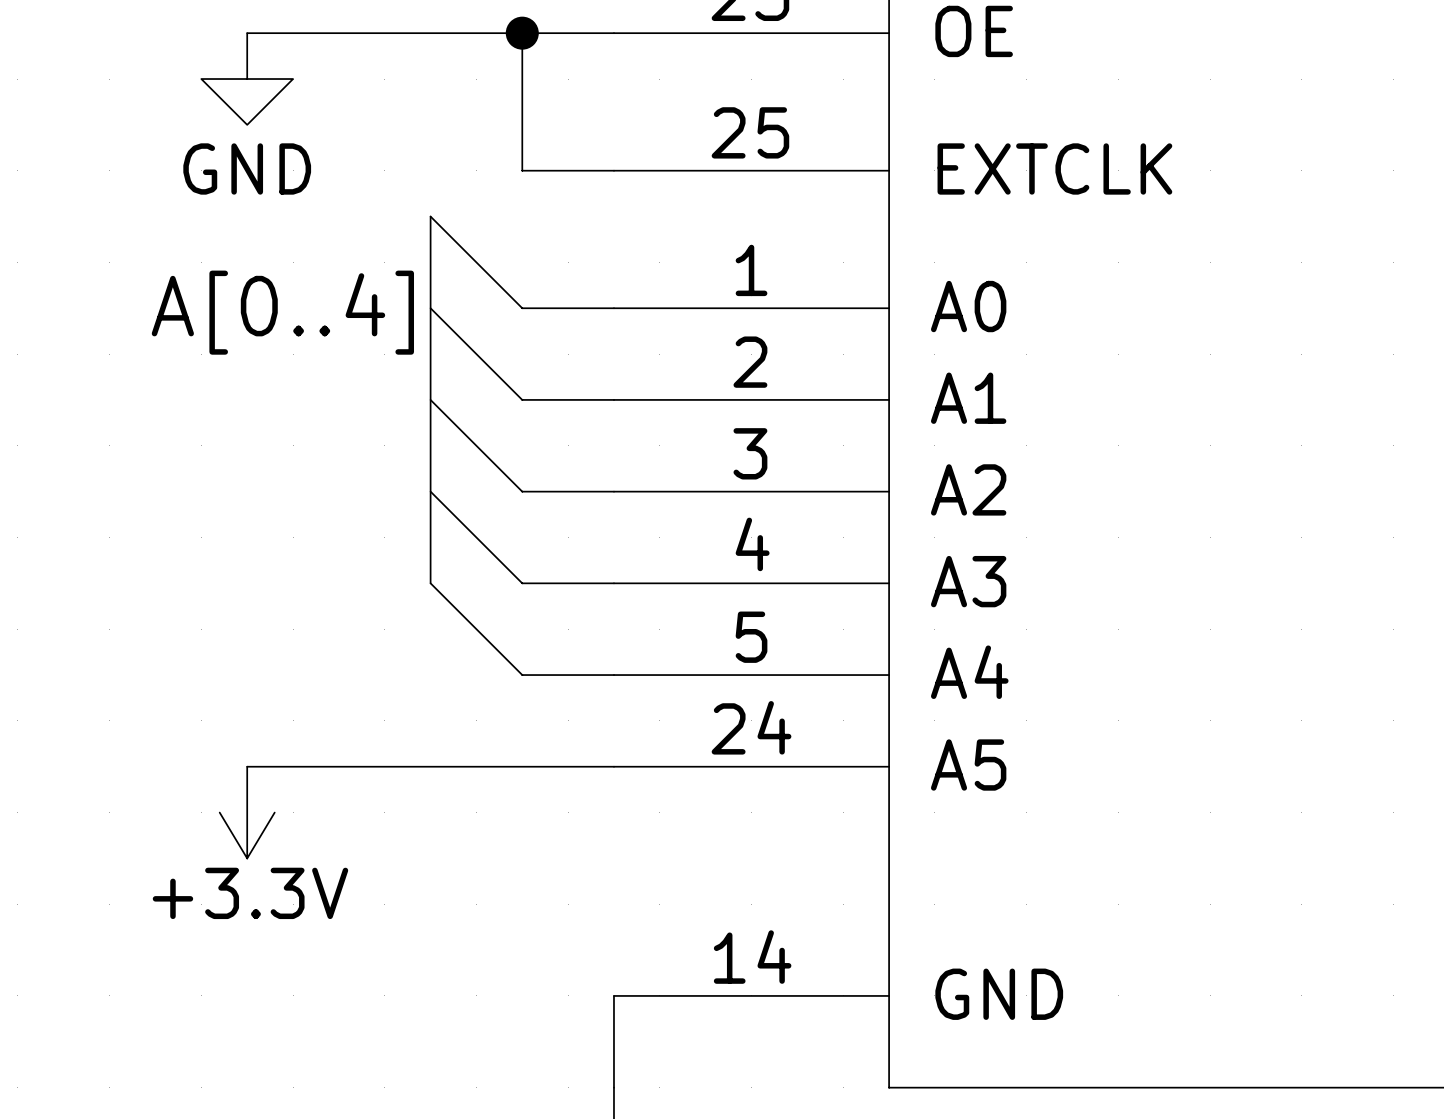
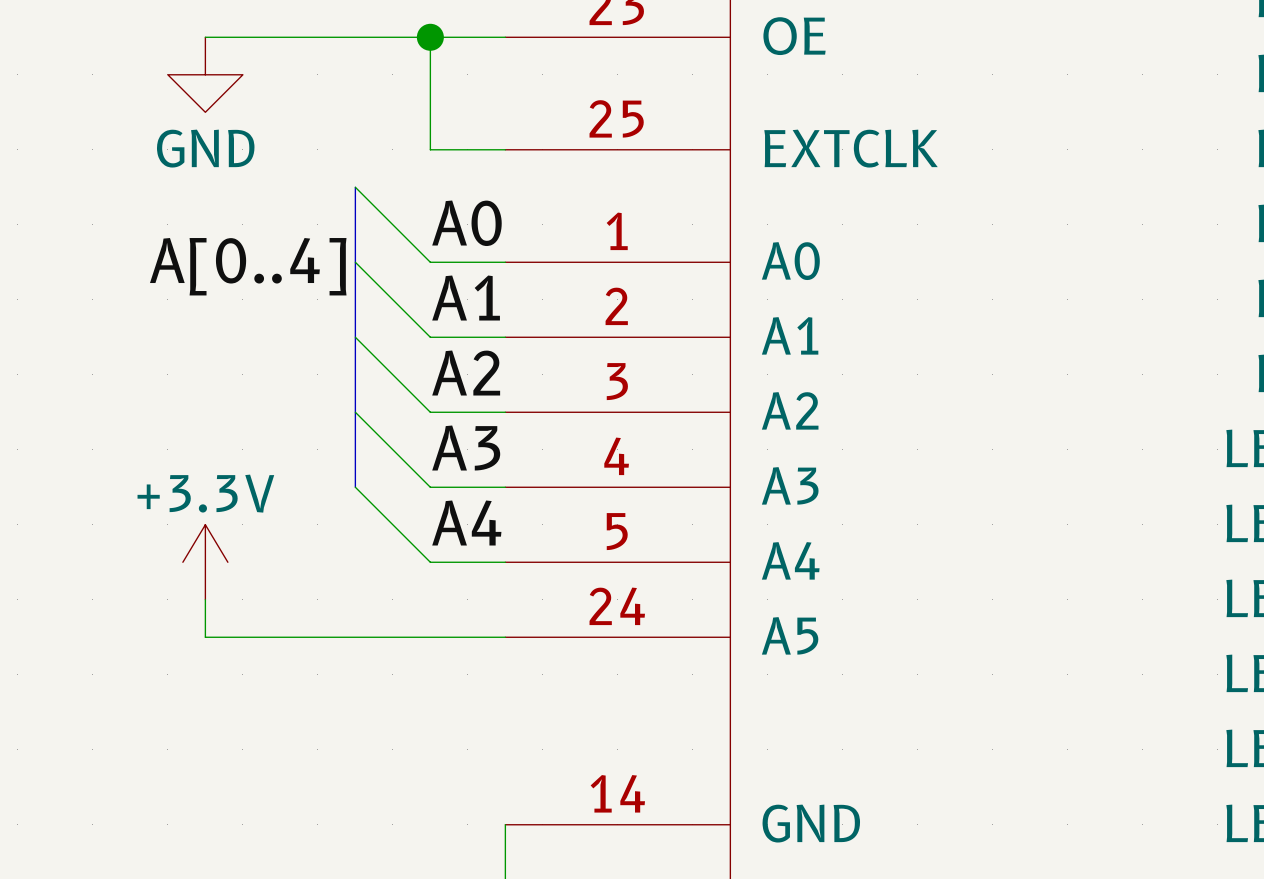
label: none -> A0 (466, 223)
label: none -> A1 (466, 298)
label: none -> A2 (466, 373)
label: none -> A3 (466, 448)
label: none -> A4 (466, 523)
wire: none -> (205, 599) (205, 637)
power symbol rotation: 0° (247, 812) -> 180° (205, 562)
power symbol position: +3.3V (247, 812) -> +3.3V (205, 562)

